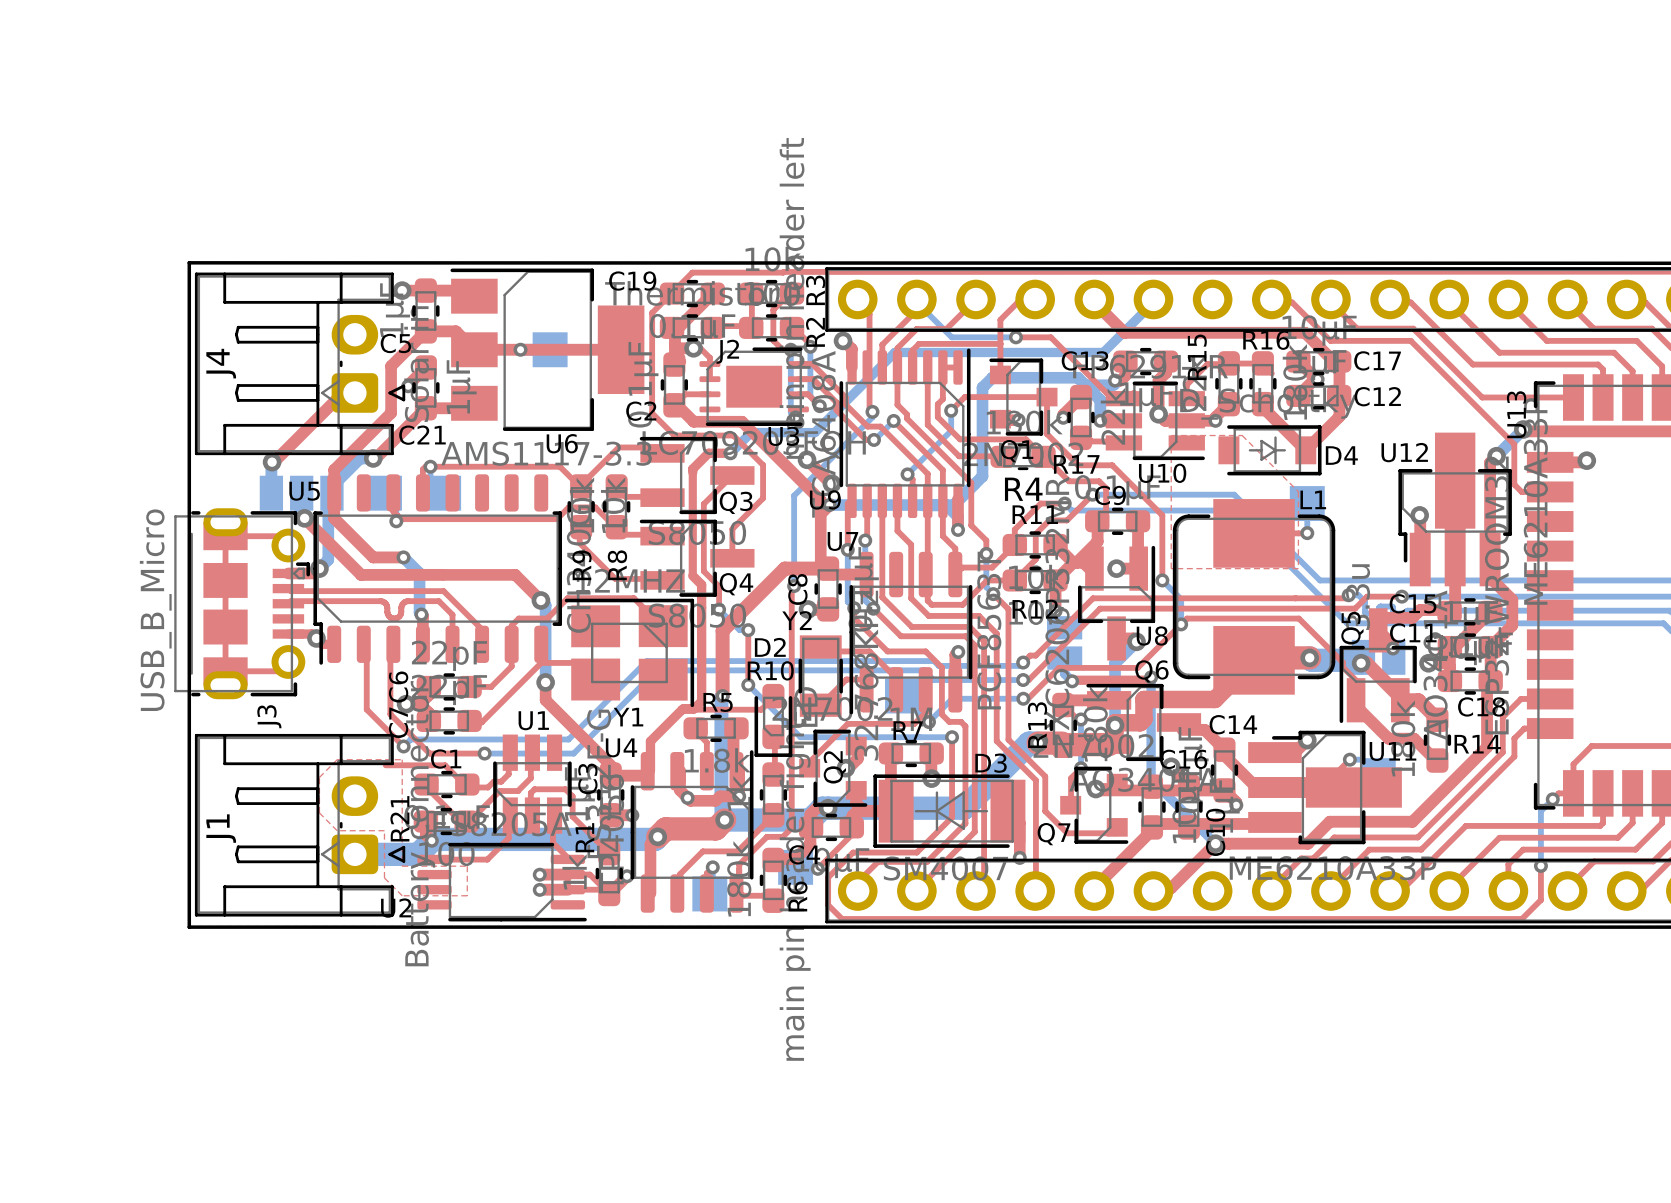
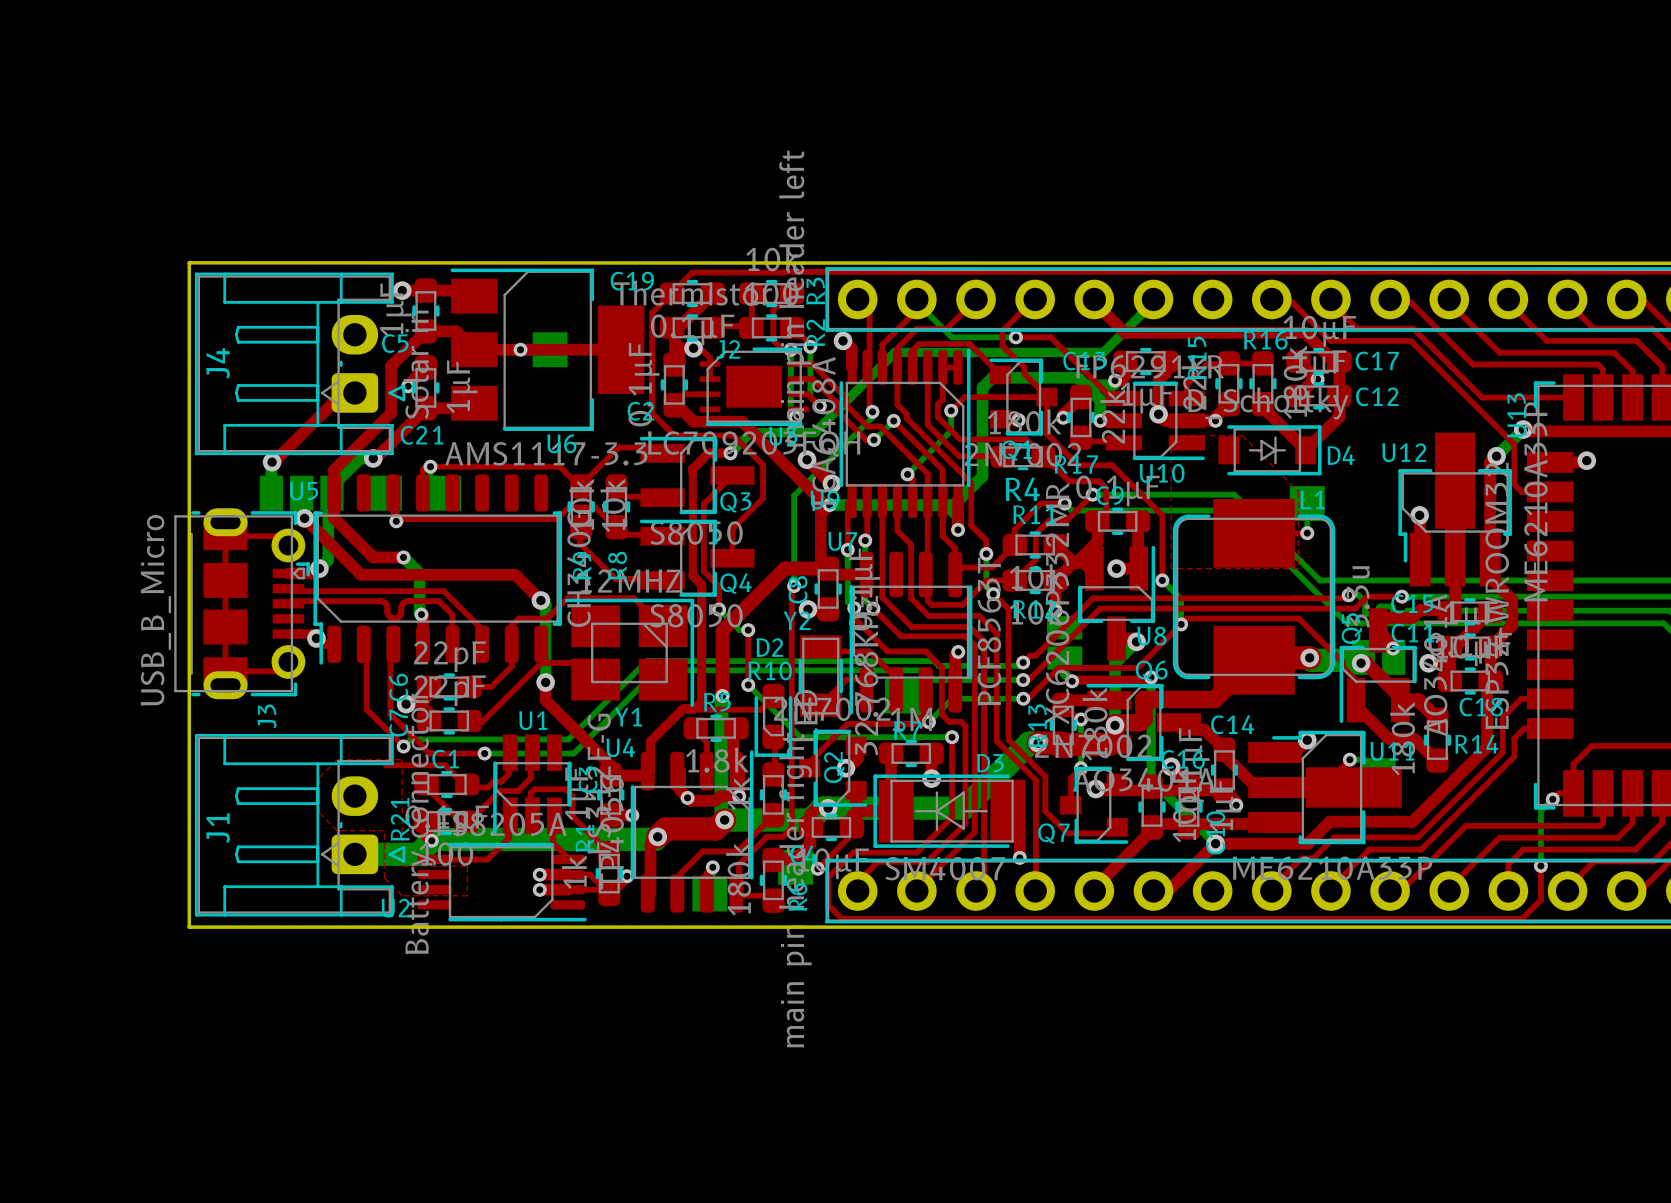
top track: none -> (1035, 299) (1002, 330) (1002, 345) (1024, 367) (1024, 374) (1047, 397)
top track: (1017, 302) (1000, 319) (1000, 374) -> none
top track: (969, 343) (1000, 343) -> (969, 343) (1000, 374)

